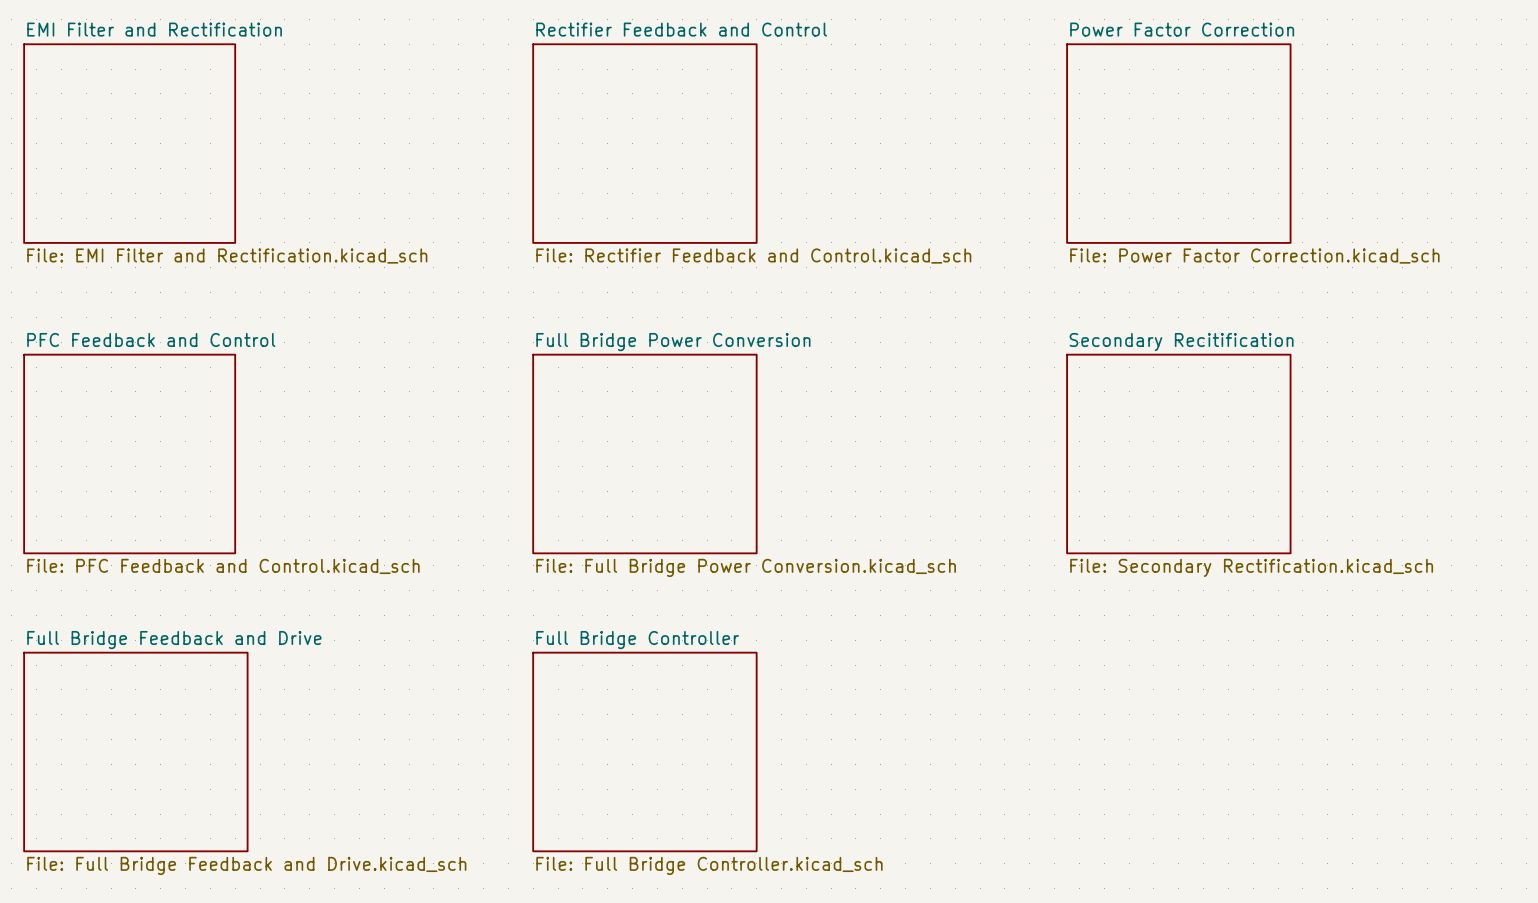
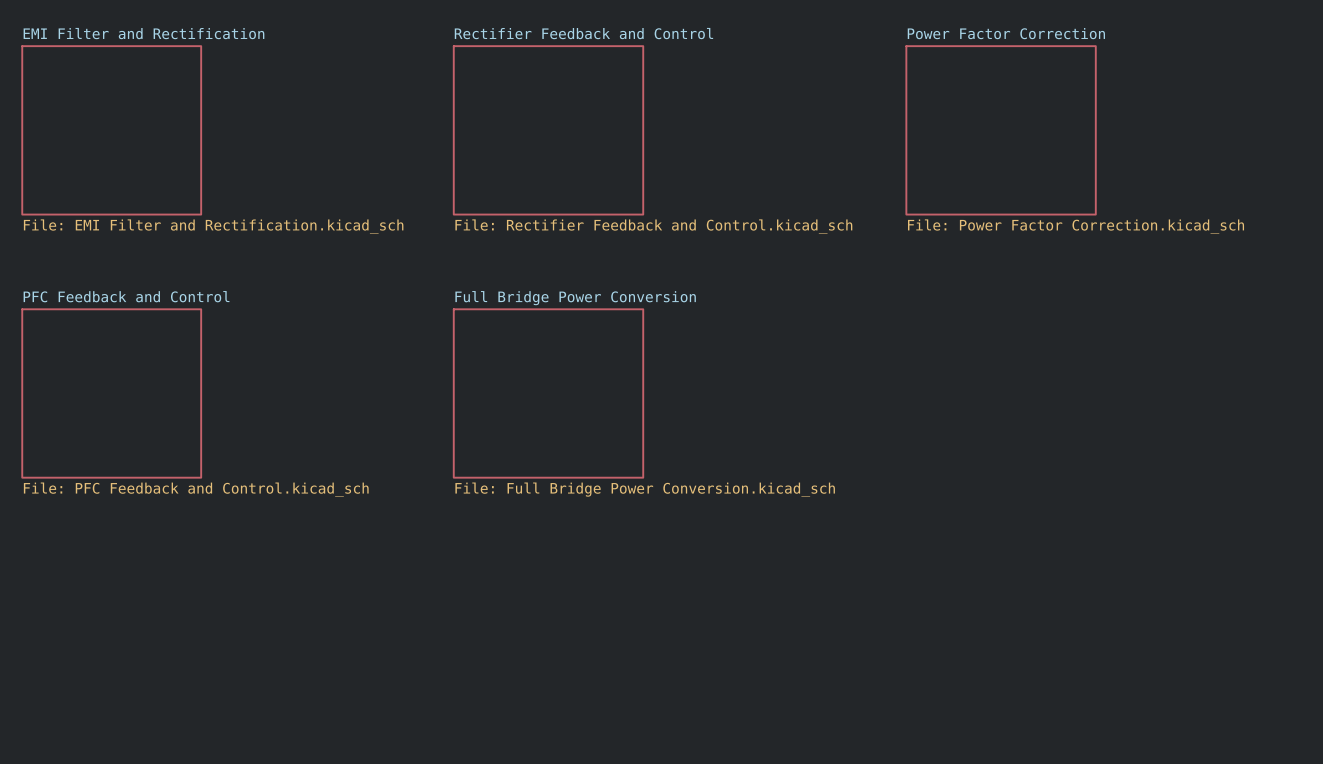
sheet Secondary Recitification: File: Secondary Rectification.kicad_sch (1178, 454) -> none
sheet Full Bridge Feedback and Drive: File: Full Bridge Feedback and Drive.kicad_sch (135, 751) -> none
sheet Full Bridge Controller: File: Full Bridge Controller.kicad_sch (644, 751) -> none

